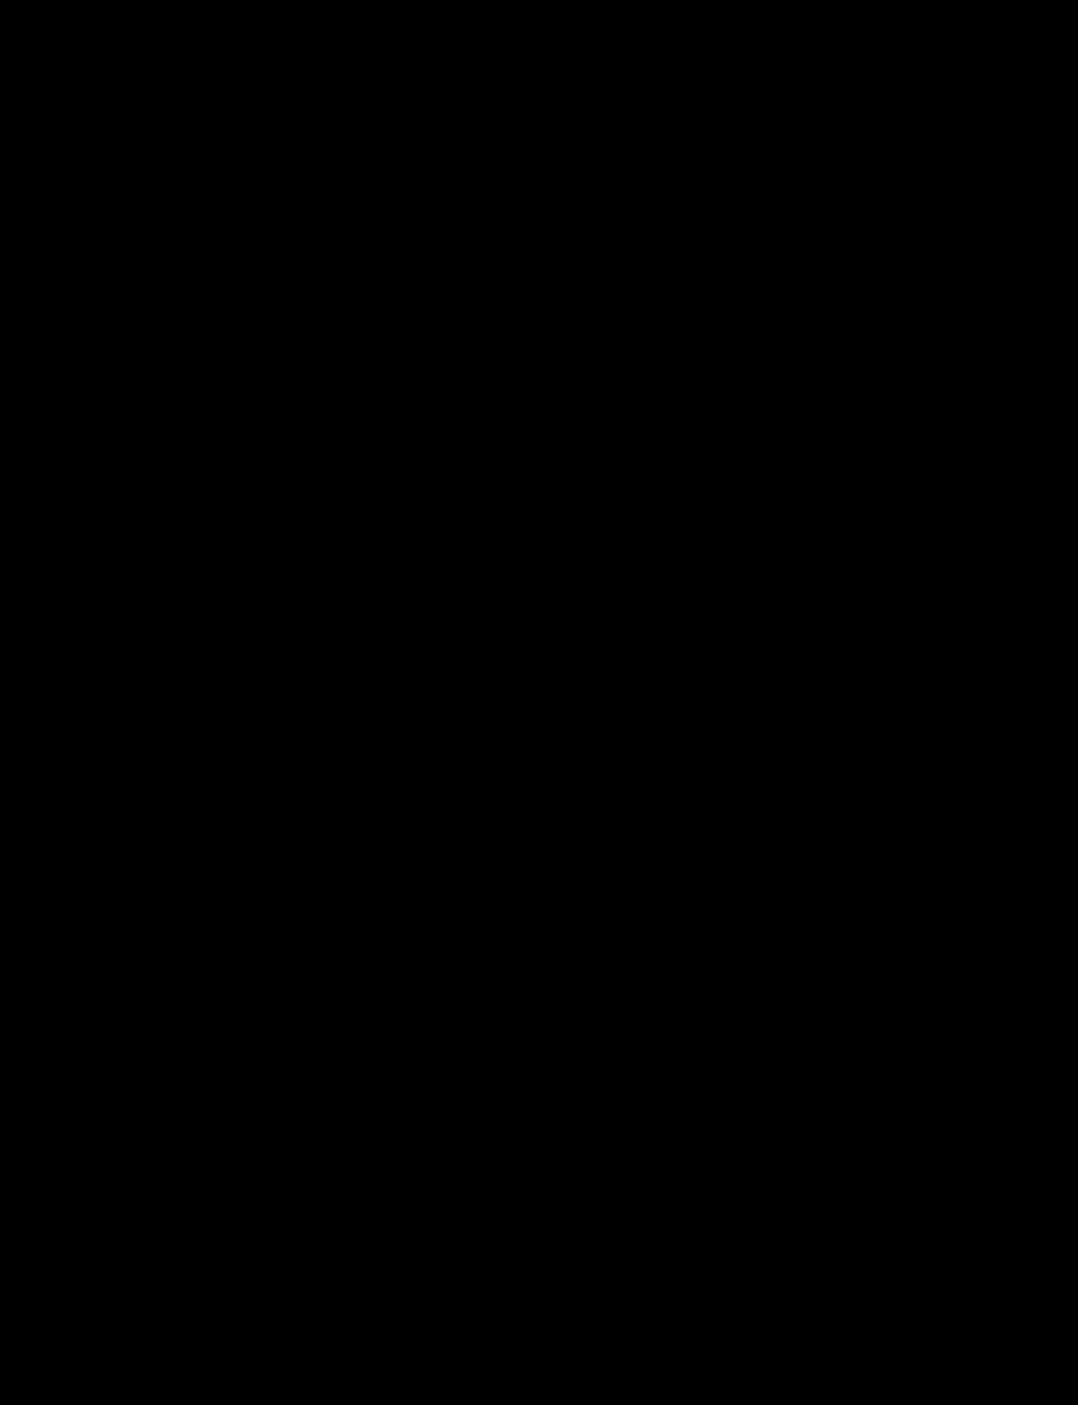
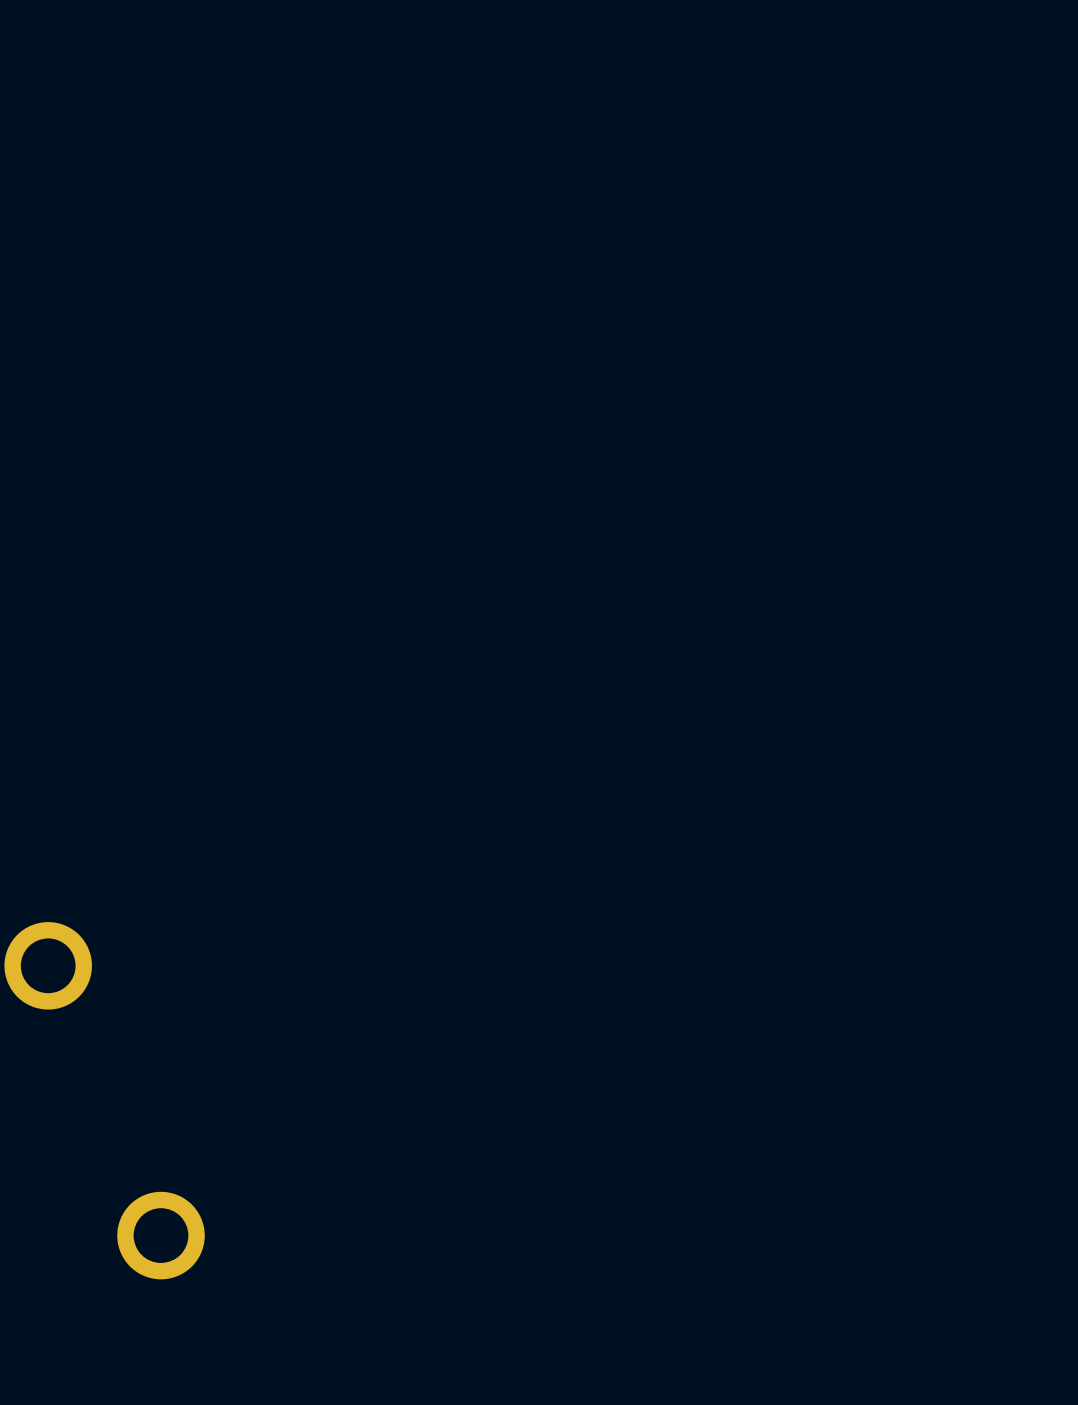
part: none -> (48, 965)
part: none -> (160, 1235)

